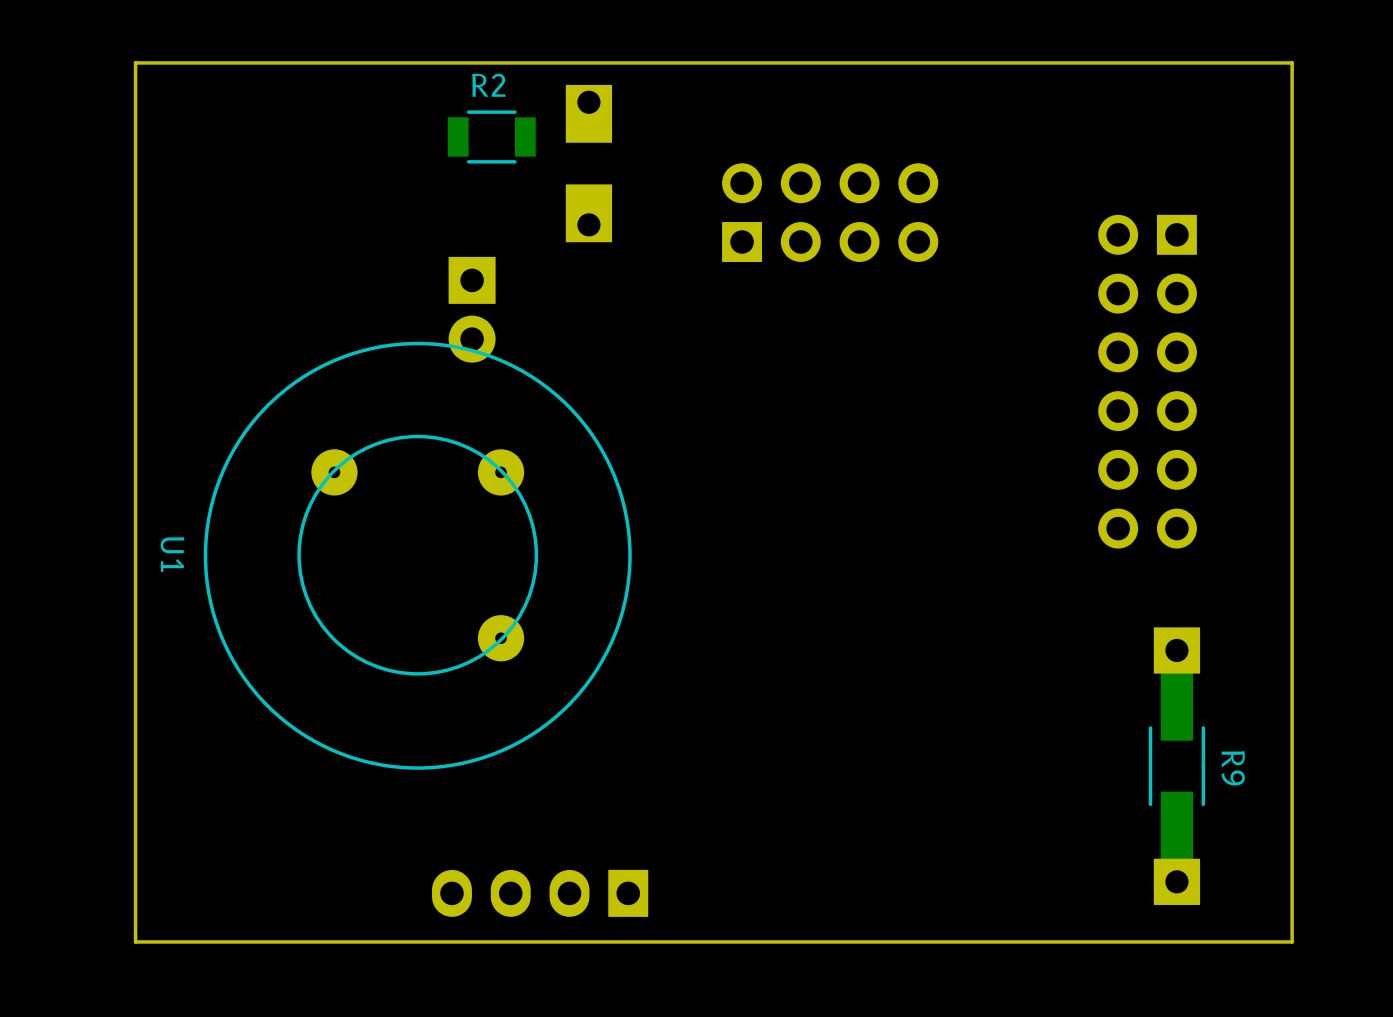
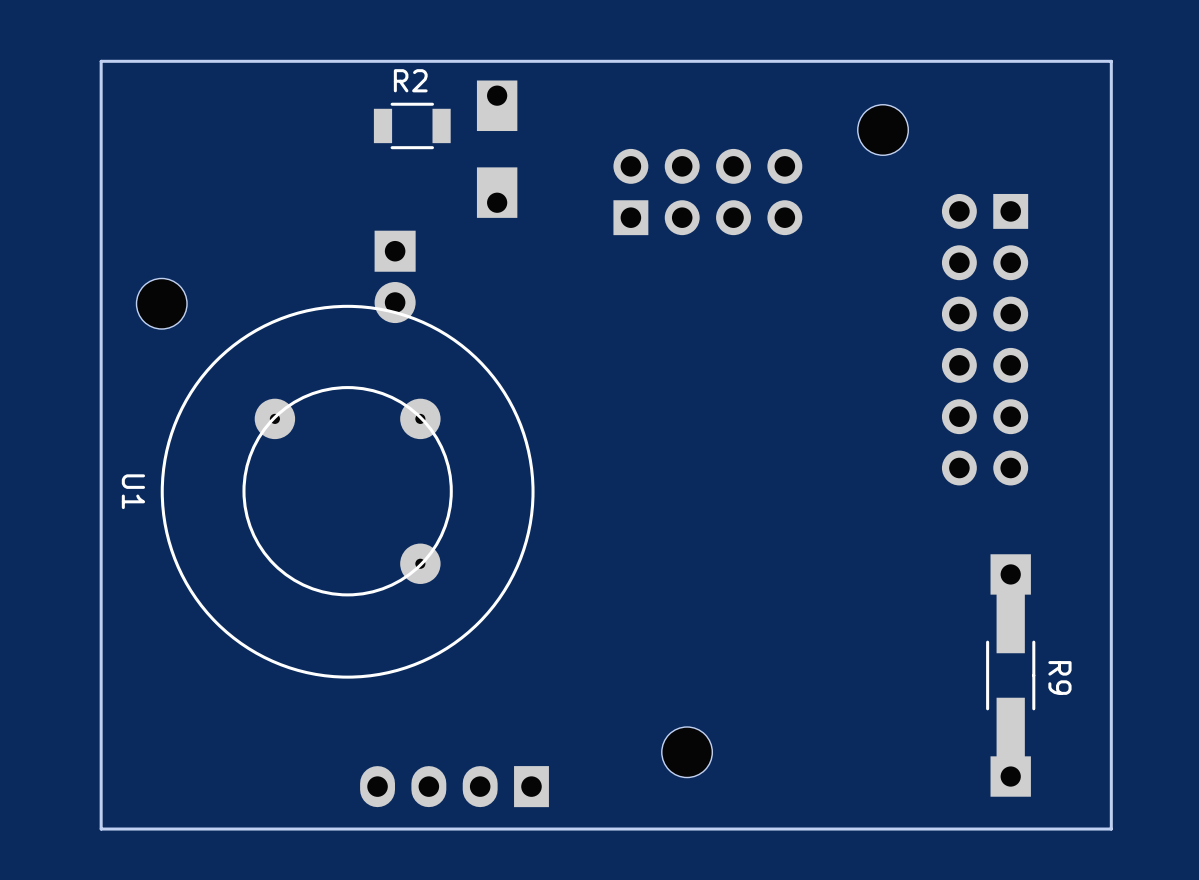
part: none -> (883, 130)
part: none -> (161, 303)
part: none -> (687, 752)

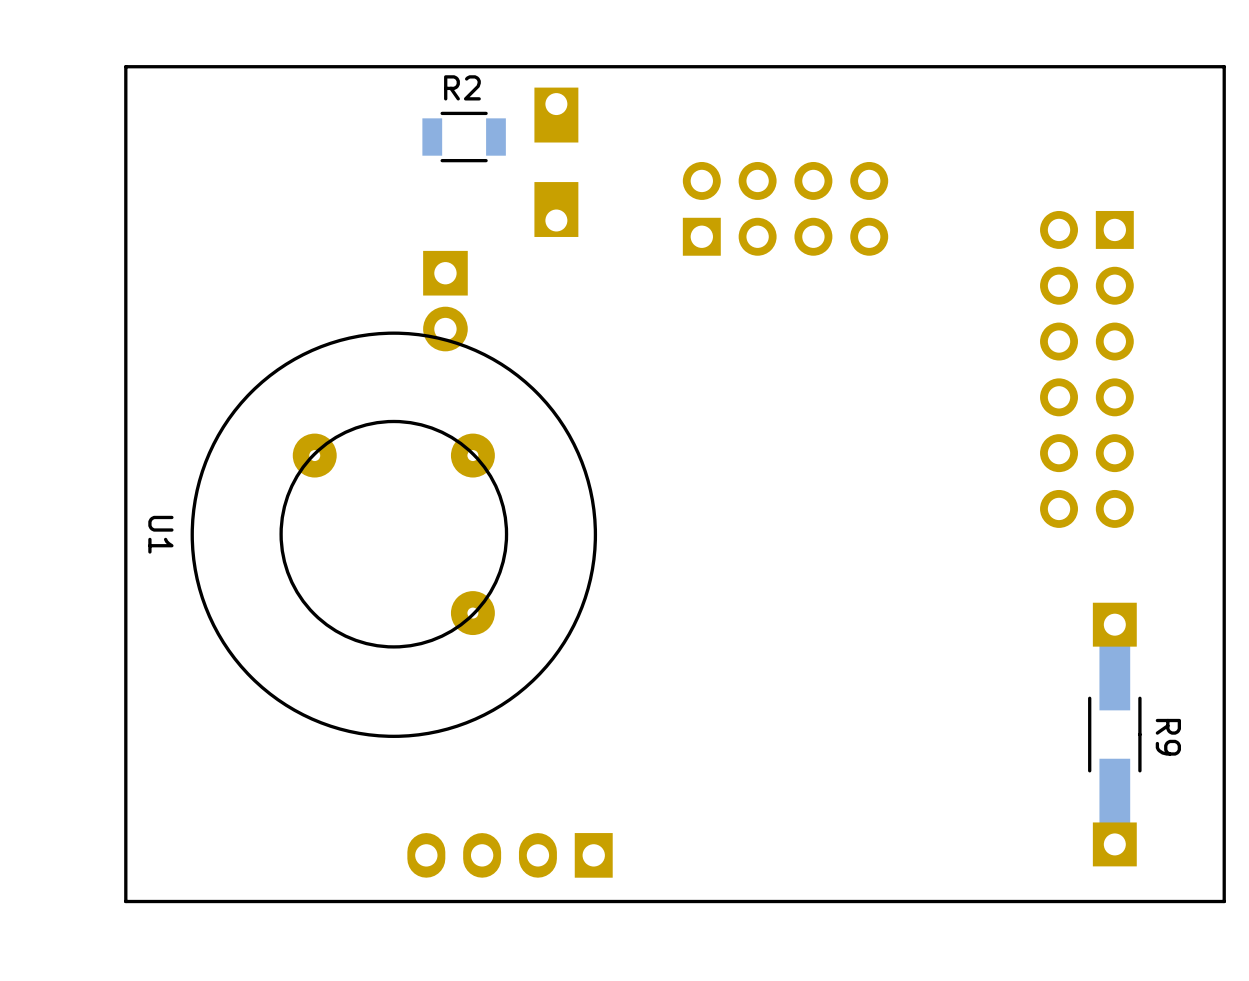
part: (883, 130) -> none
part: (161, 303) -> none
part: (687, 752) -> none

